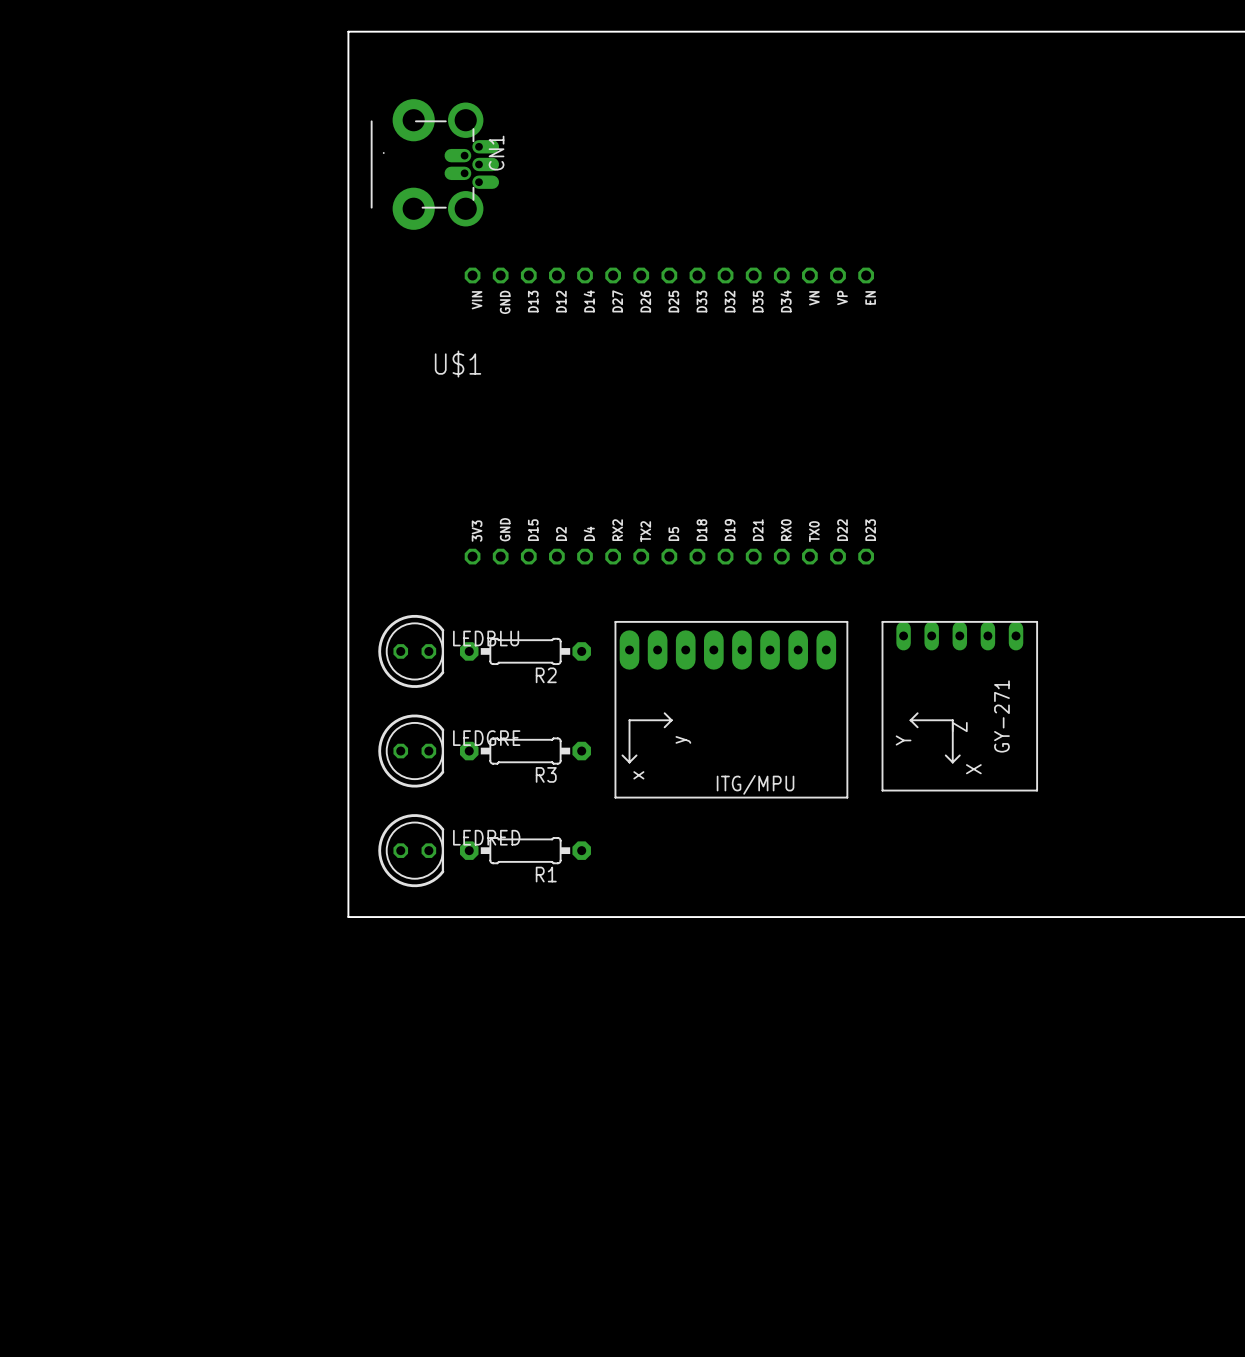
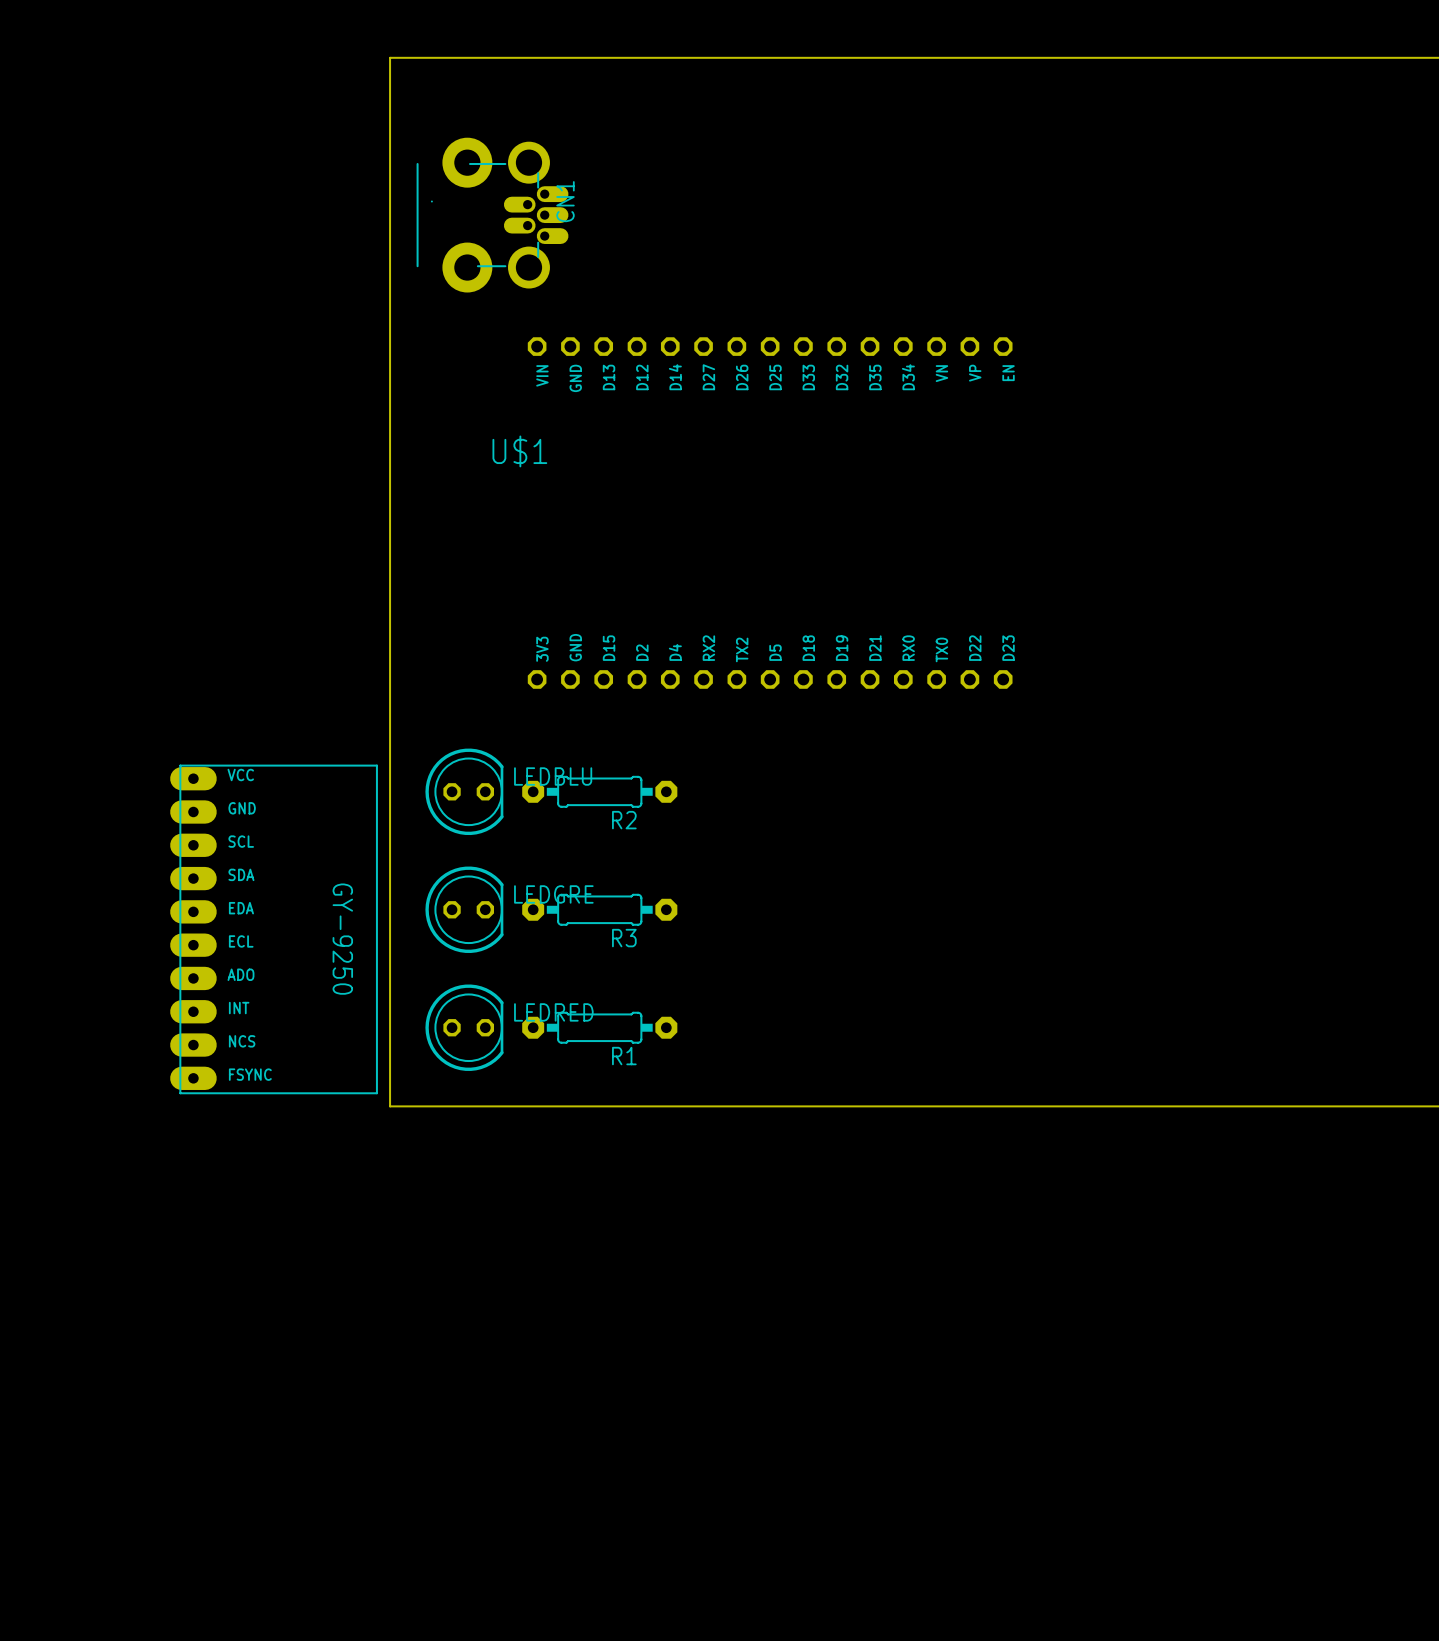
part: (959, 706) -> none
part: (731, 709) -> none
part: none -> (273, 929)

